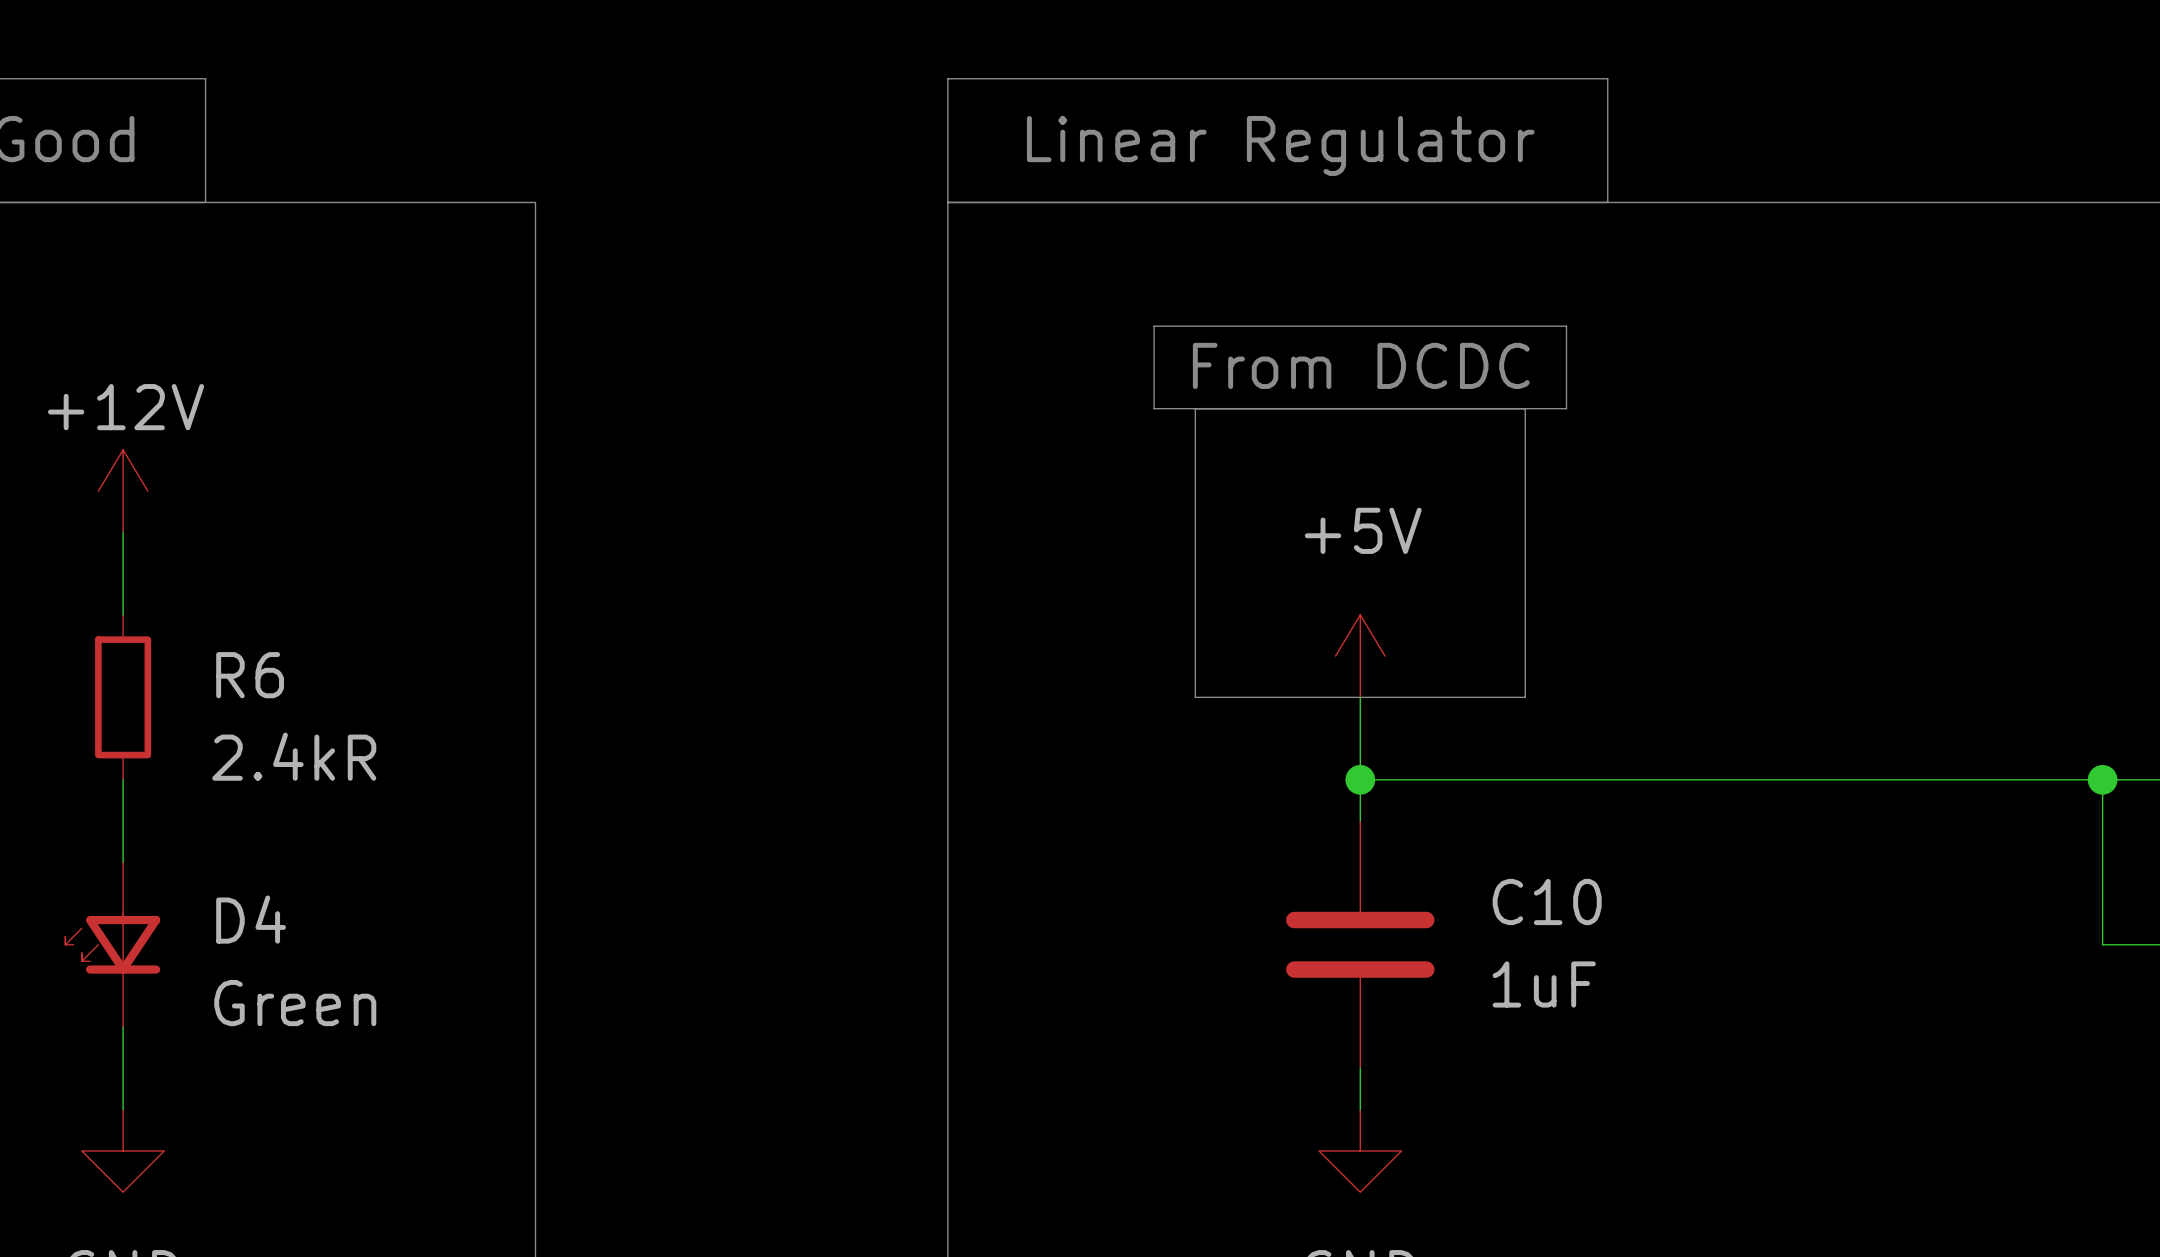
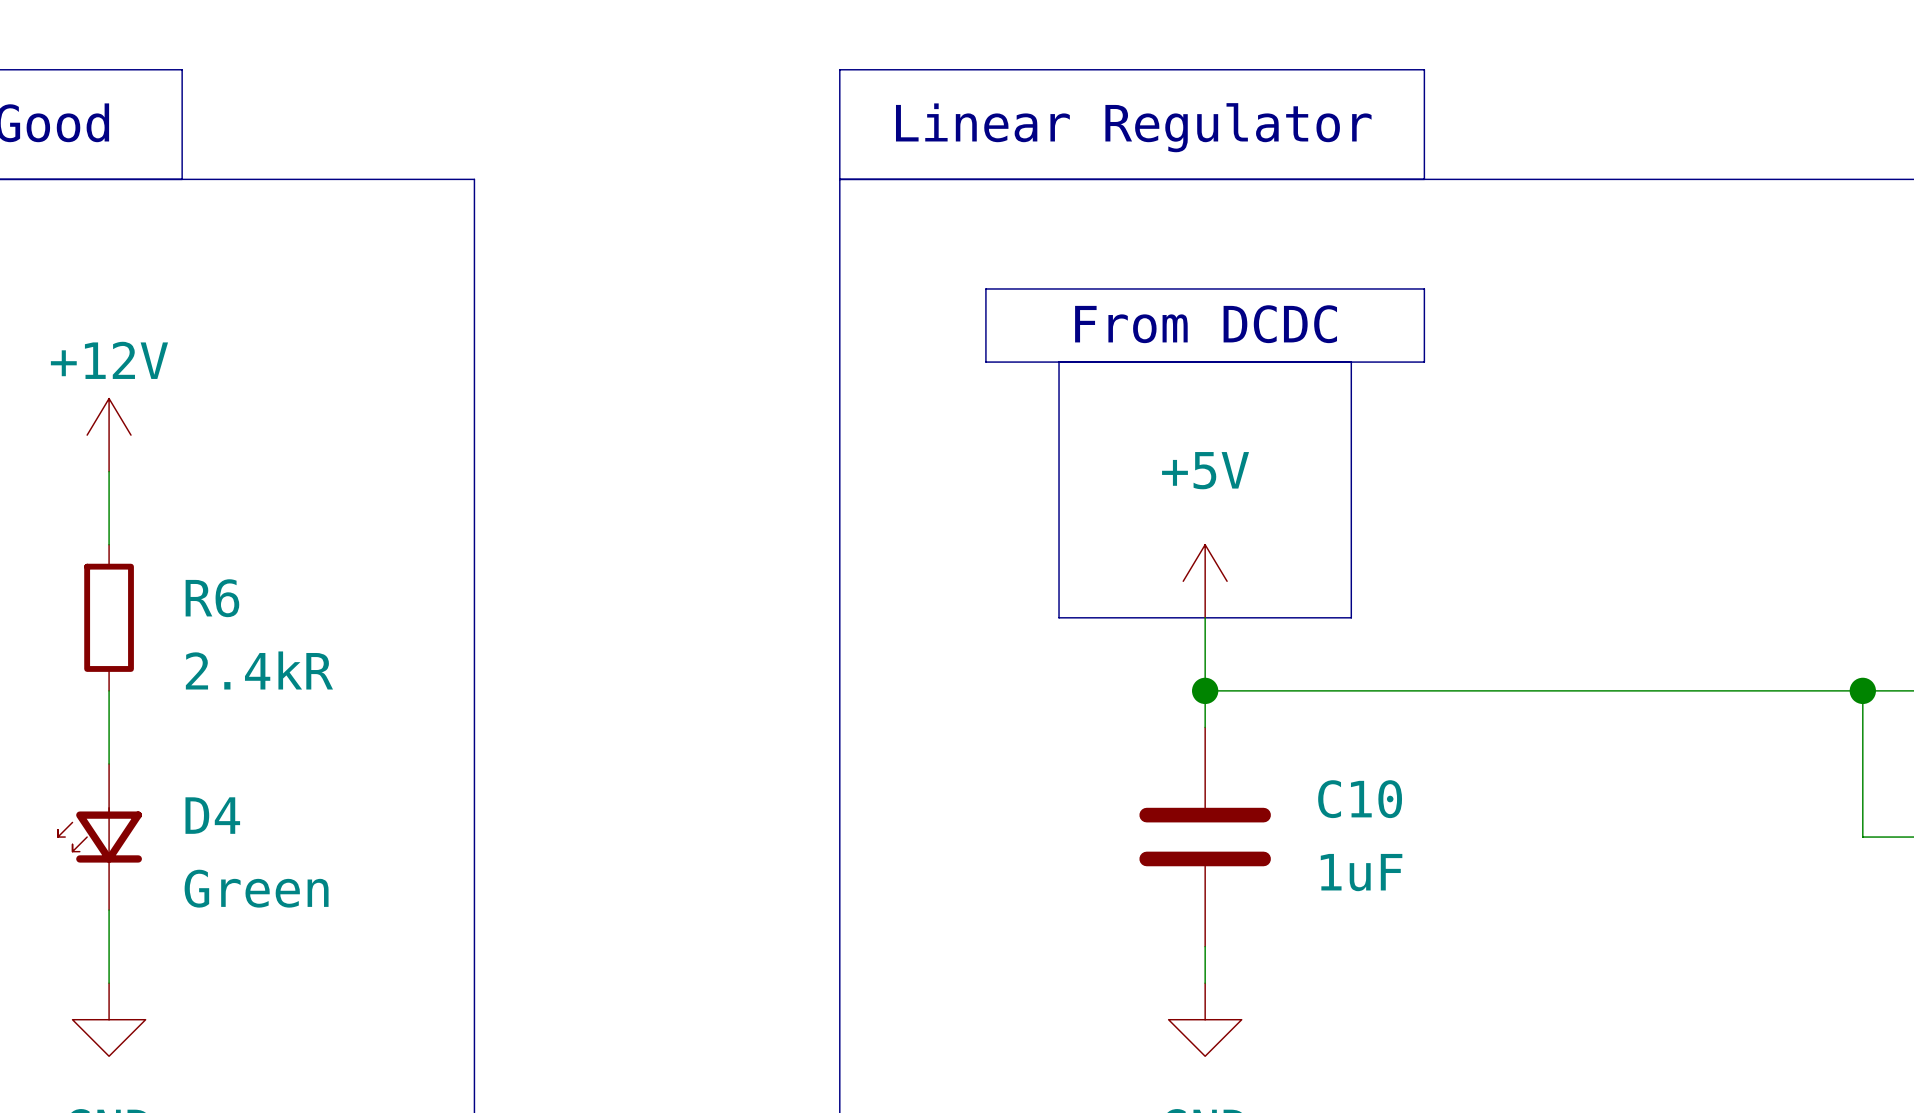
line: (1154, 326) (1154, 408) -> (1022, 288) (985, 288) (985, 362) (1022, 362)
line: (1566, 326) (1566, 408) -> (1387, 288) (1424, 288) (1424, 362) (1387, 362)

